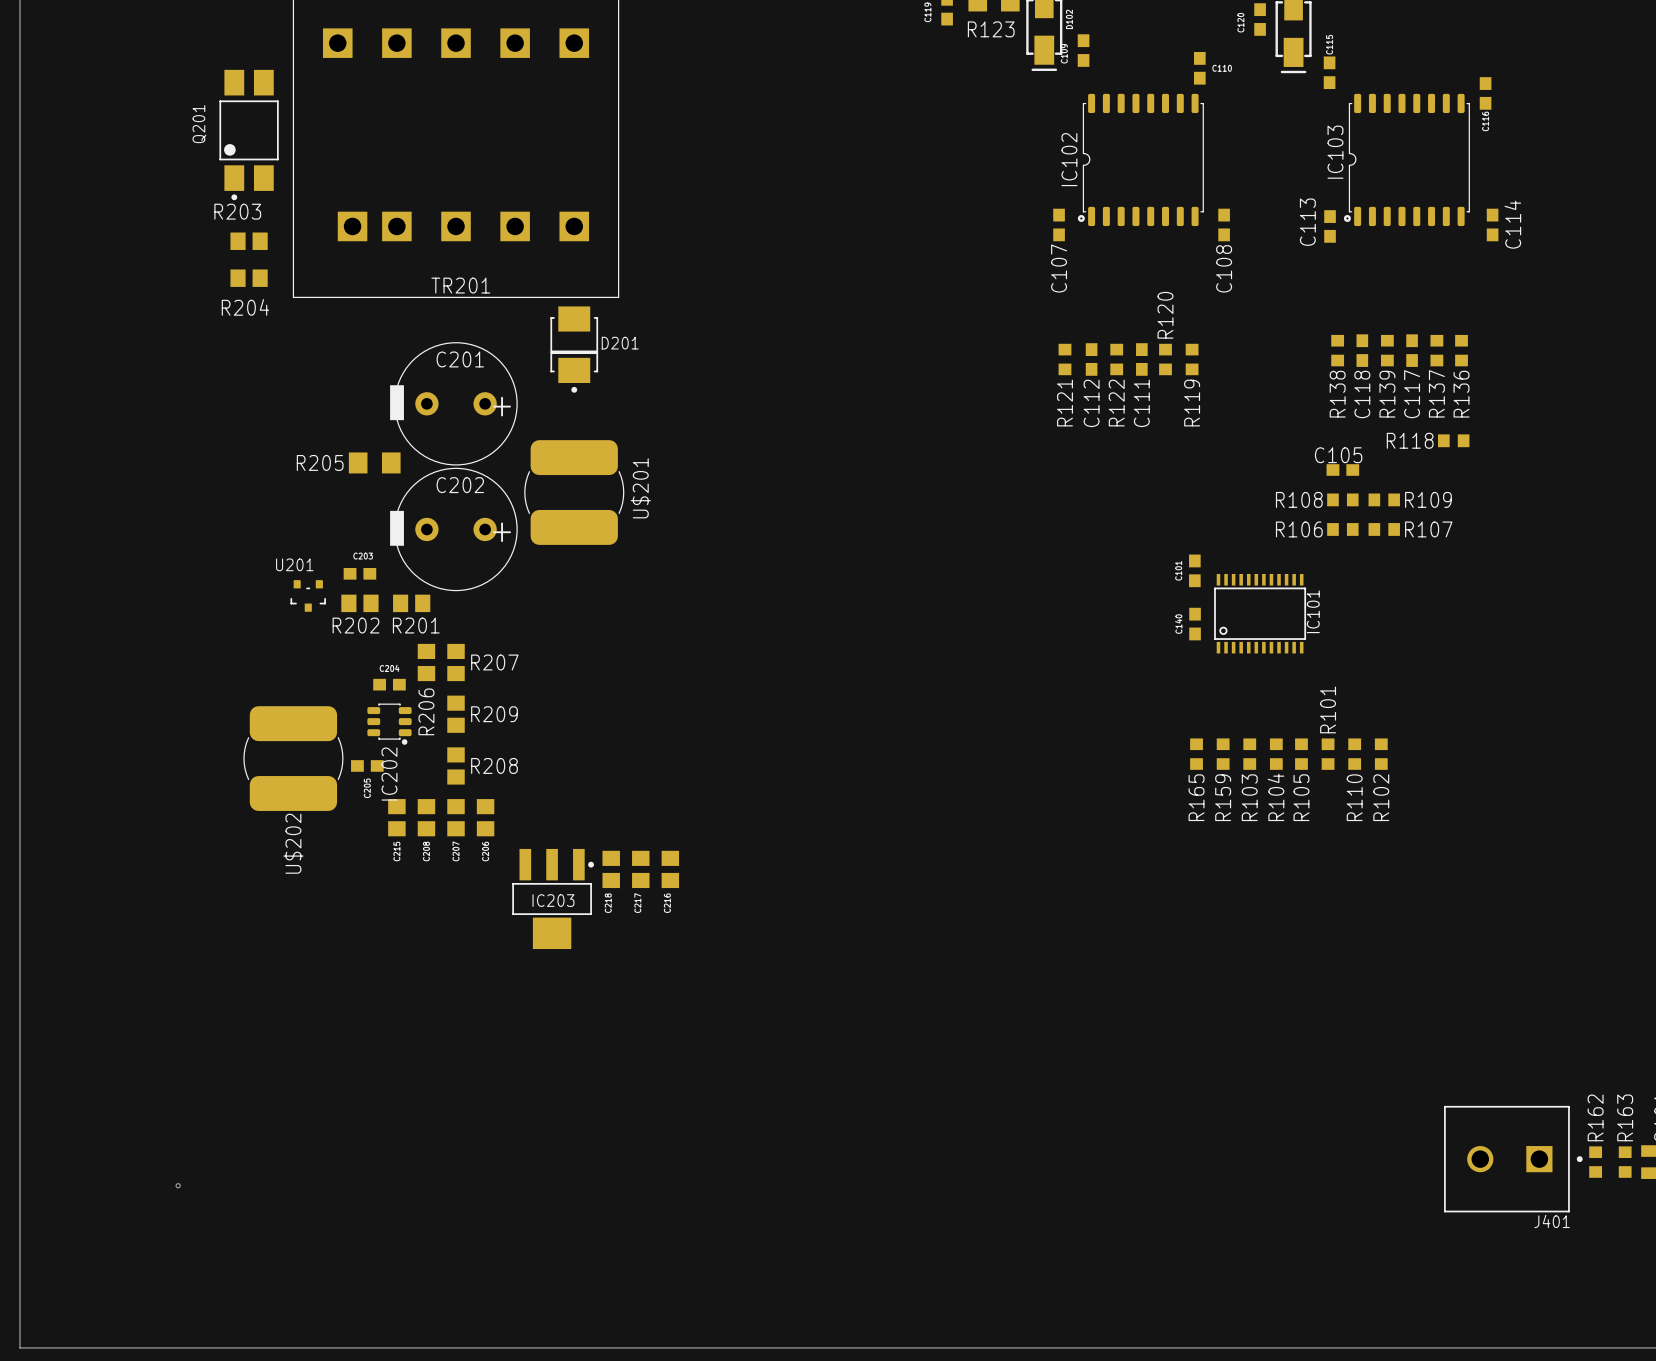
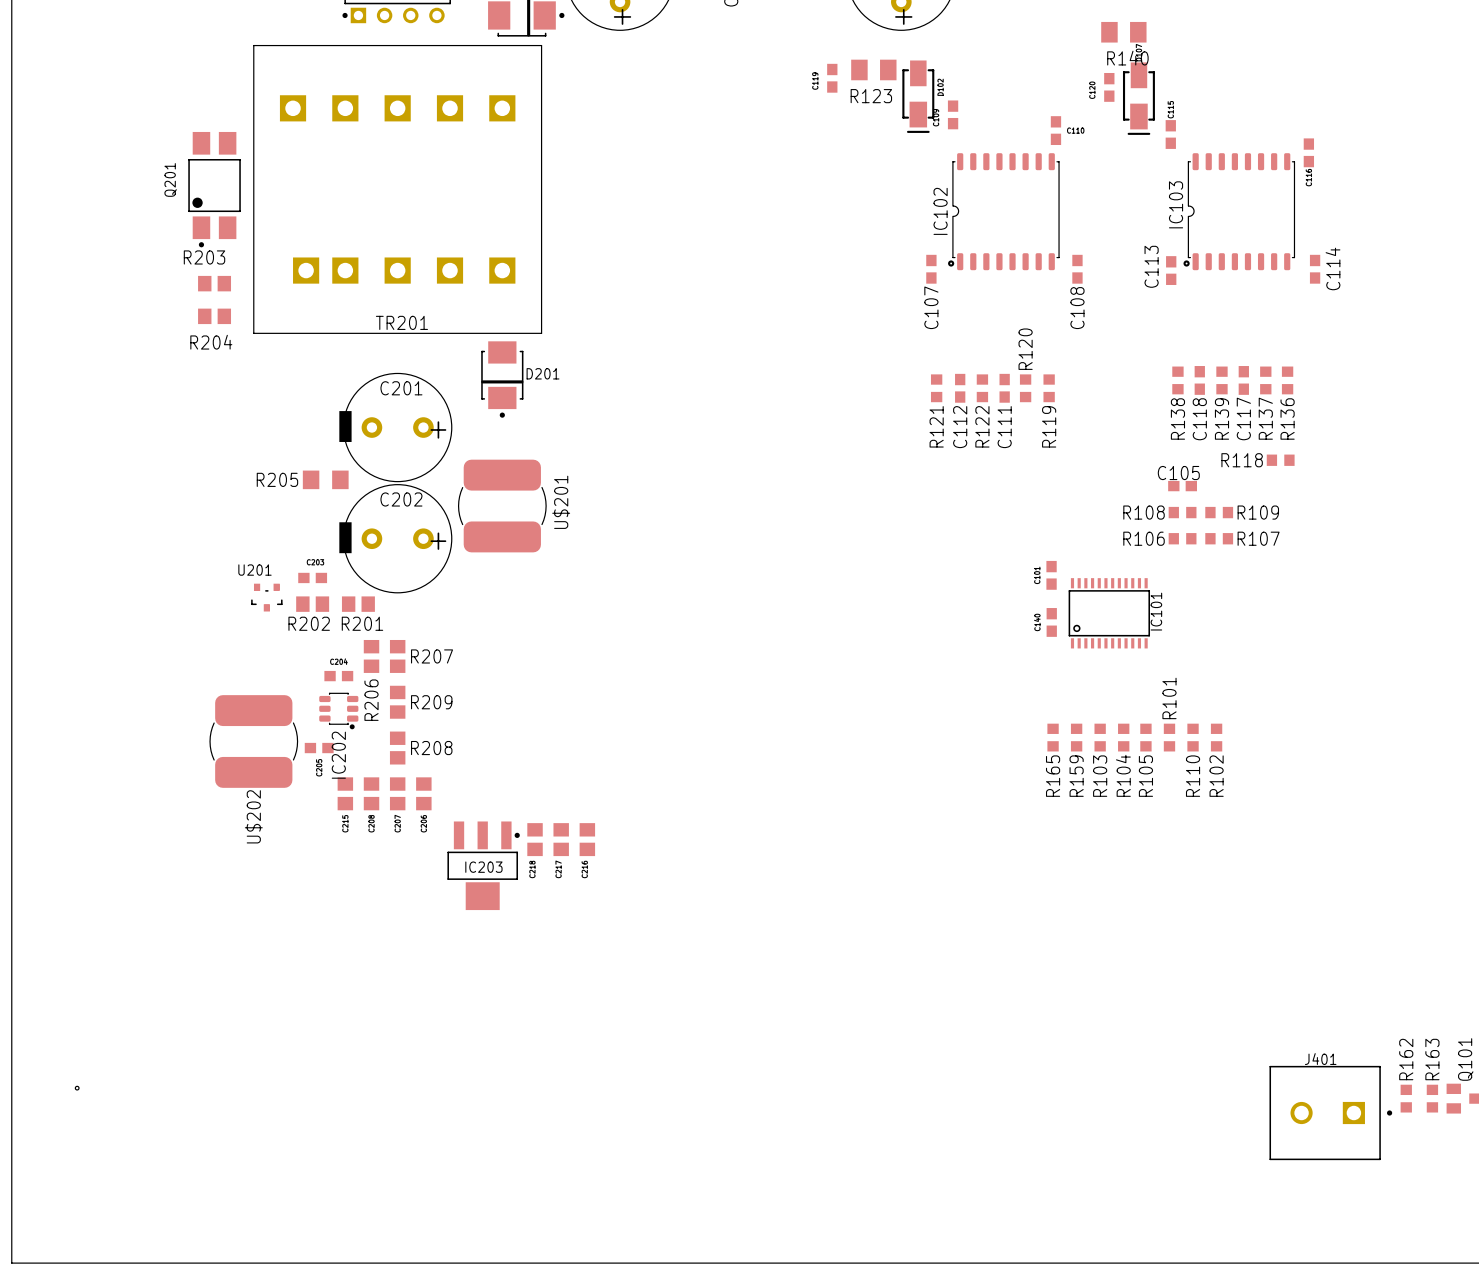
J401 footprint: [1444, 1105, 1583, 1213] -> [1269, 1065, 1393, 1161]
hole position: (178, 1185) -> (77, 1088)
J401 name position: J401 (1552, 1221) -> J401 (1320, 1059)

